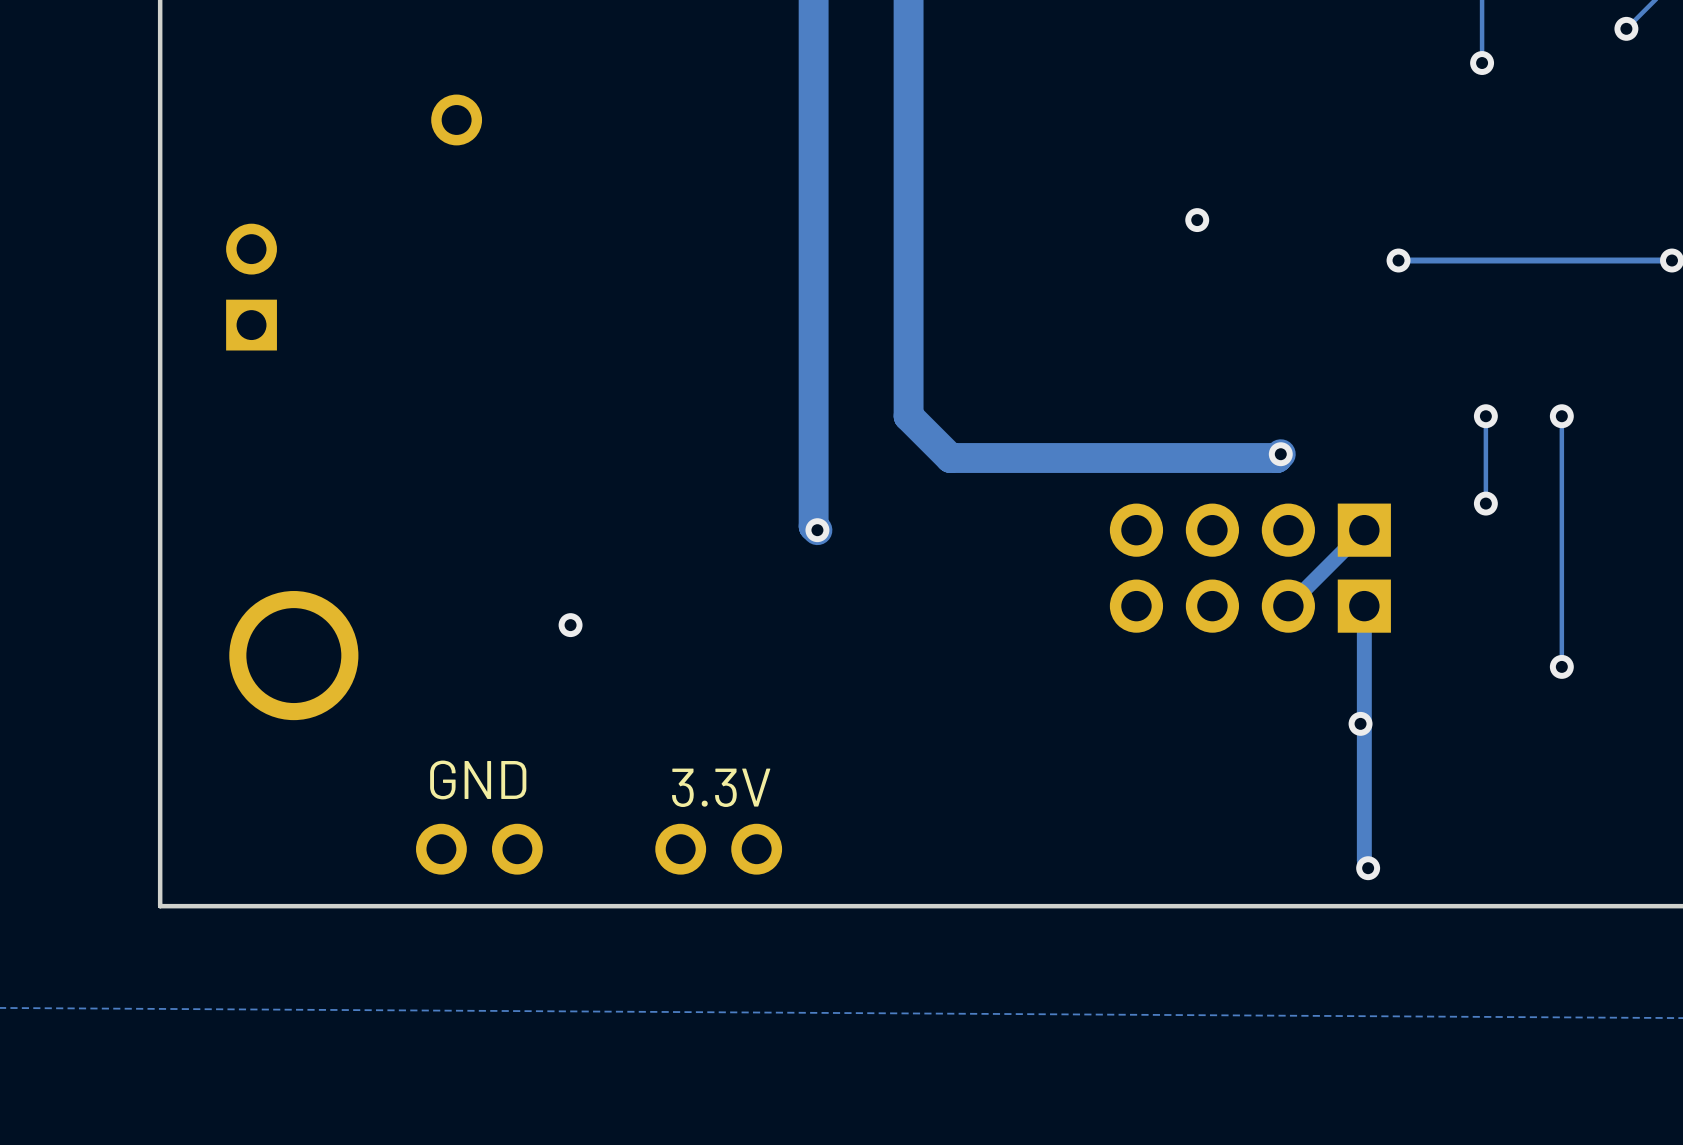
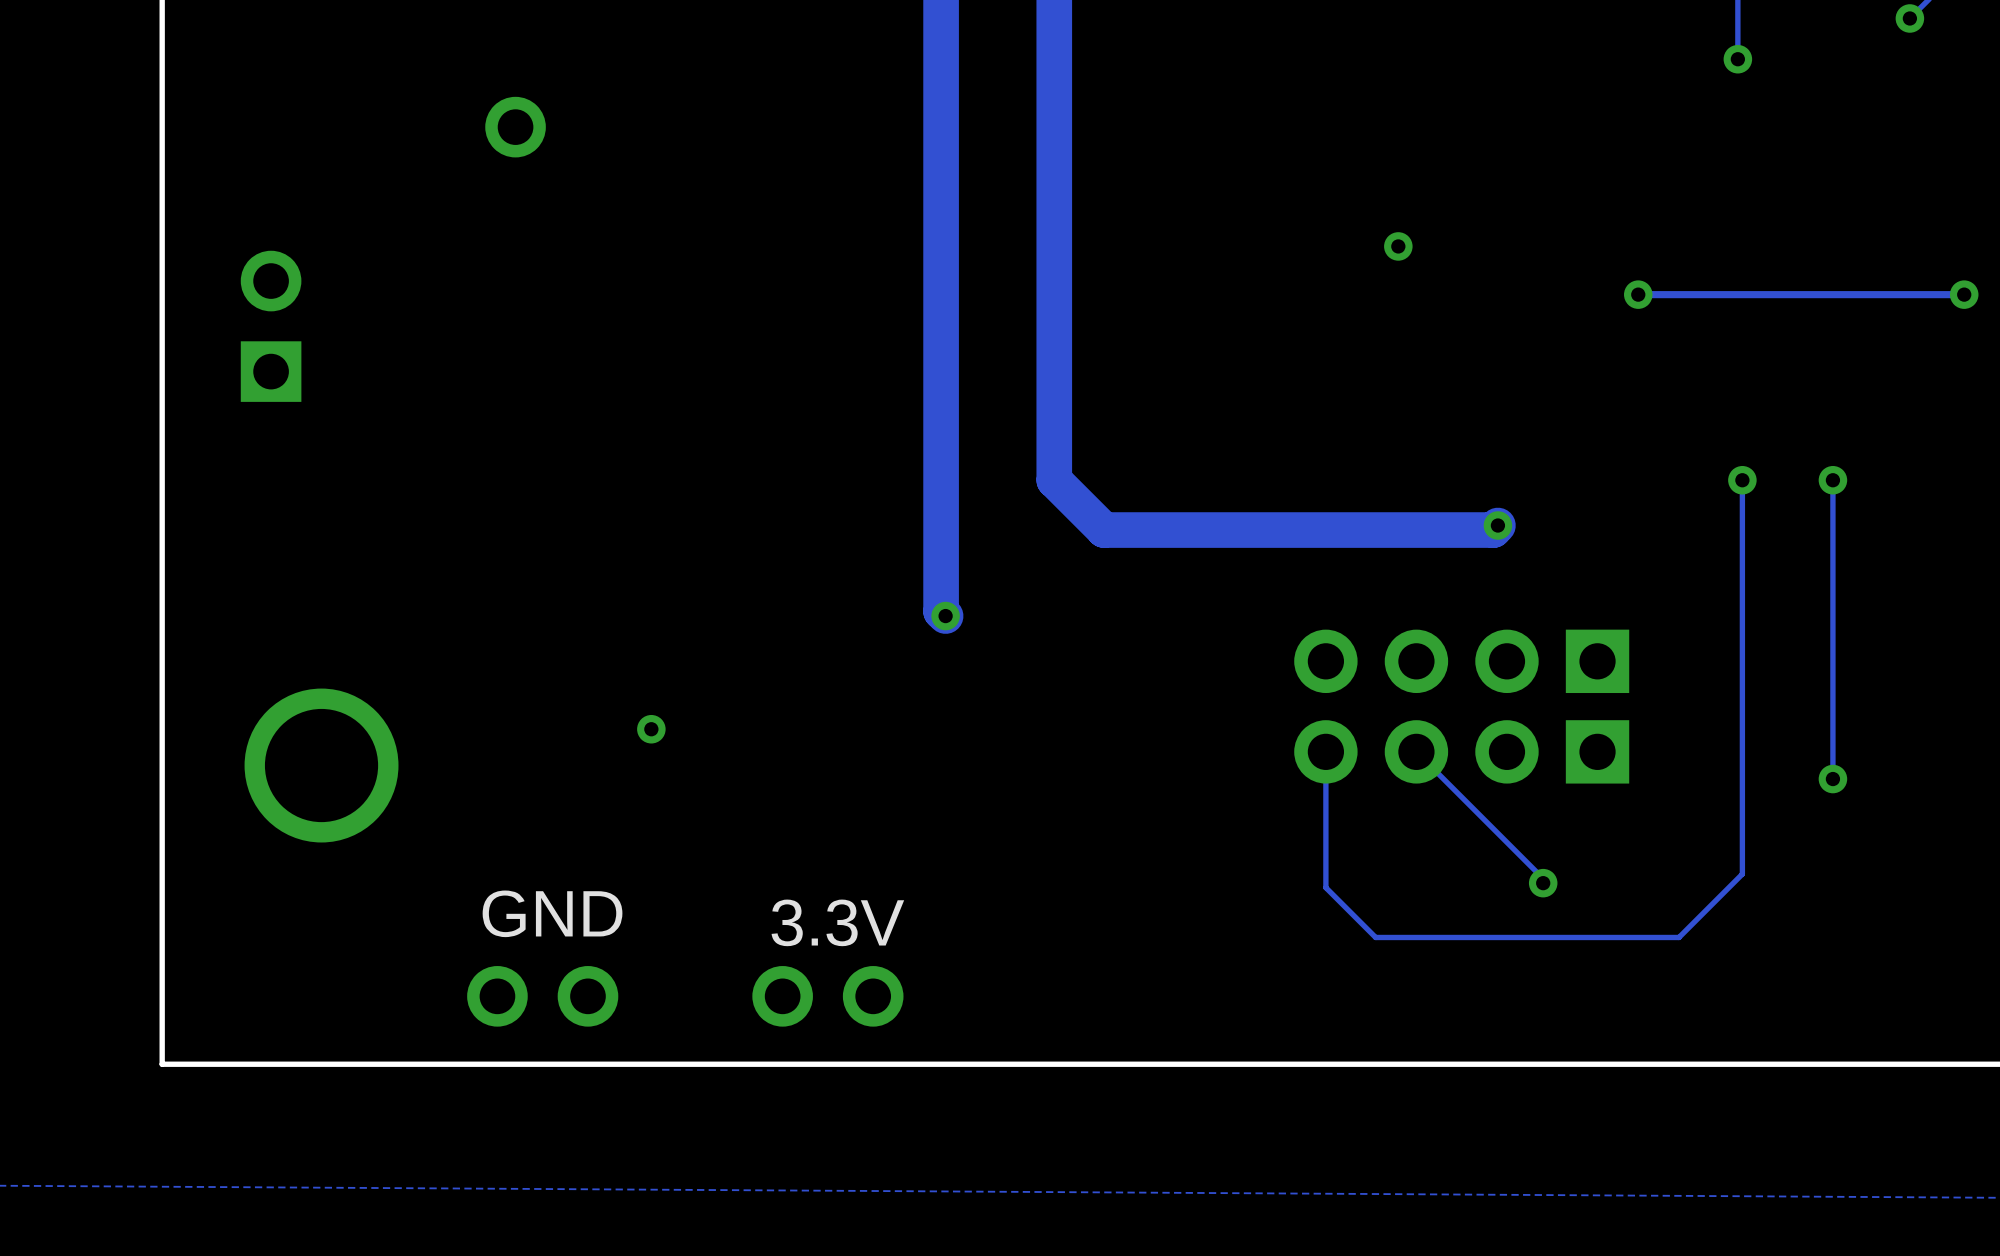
track: none -> (1742, 584) (1742, 874) (1679, 937) (1375, 937) (1325, 887) (1325, 751)
via: (1485, 503) -> none
track: (1364, 530) (1288, 606) -> none
part position: (1250, 568) -> (1461, 706)
track: (1364, 606) (1364, 860) (1368, 864) (1368, 868) -> none
track: none -> (1416, 751) (1543, 878) (1543, 883)
via position: (1360, 723) -> (1543, 883)
via: (1368, 868) -> none

